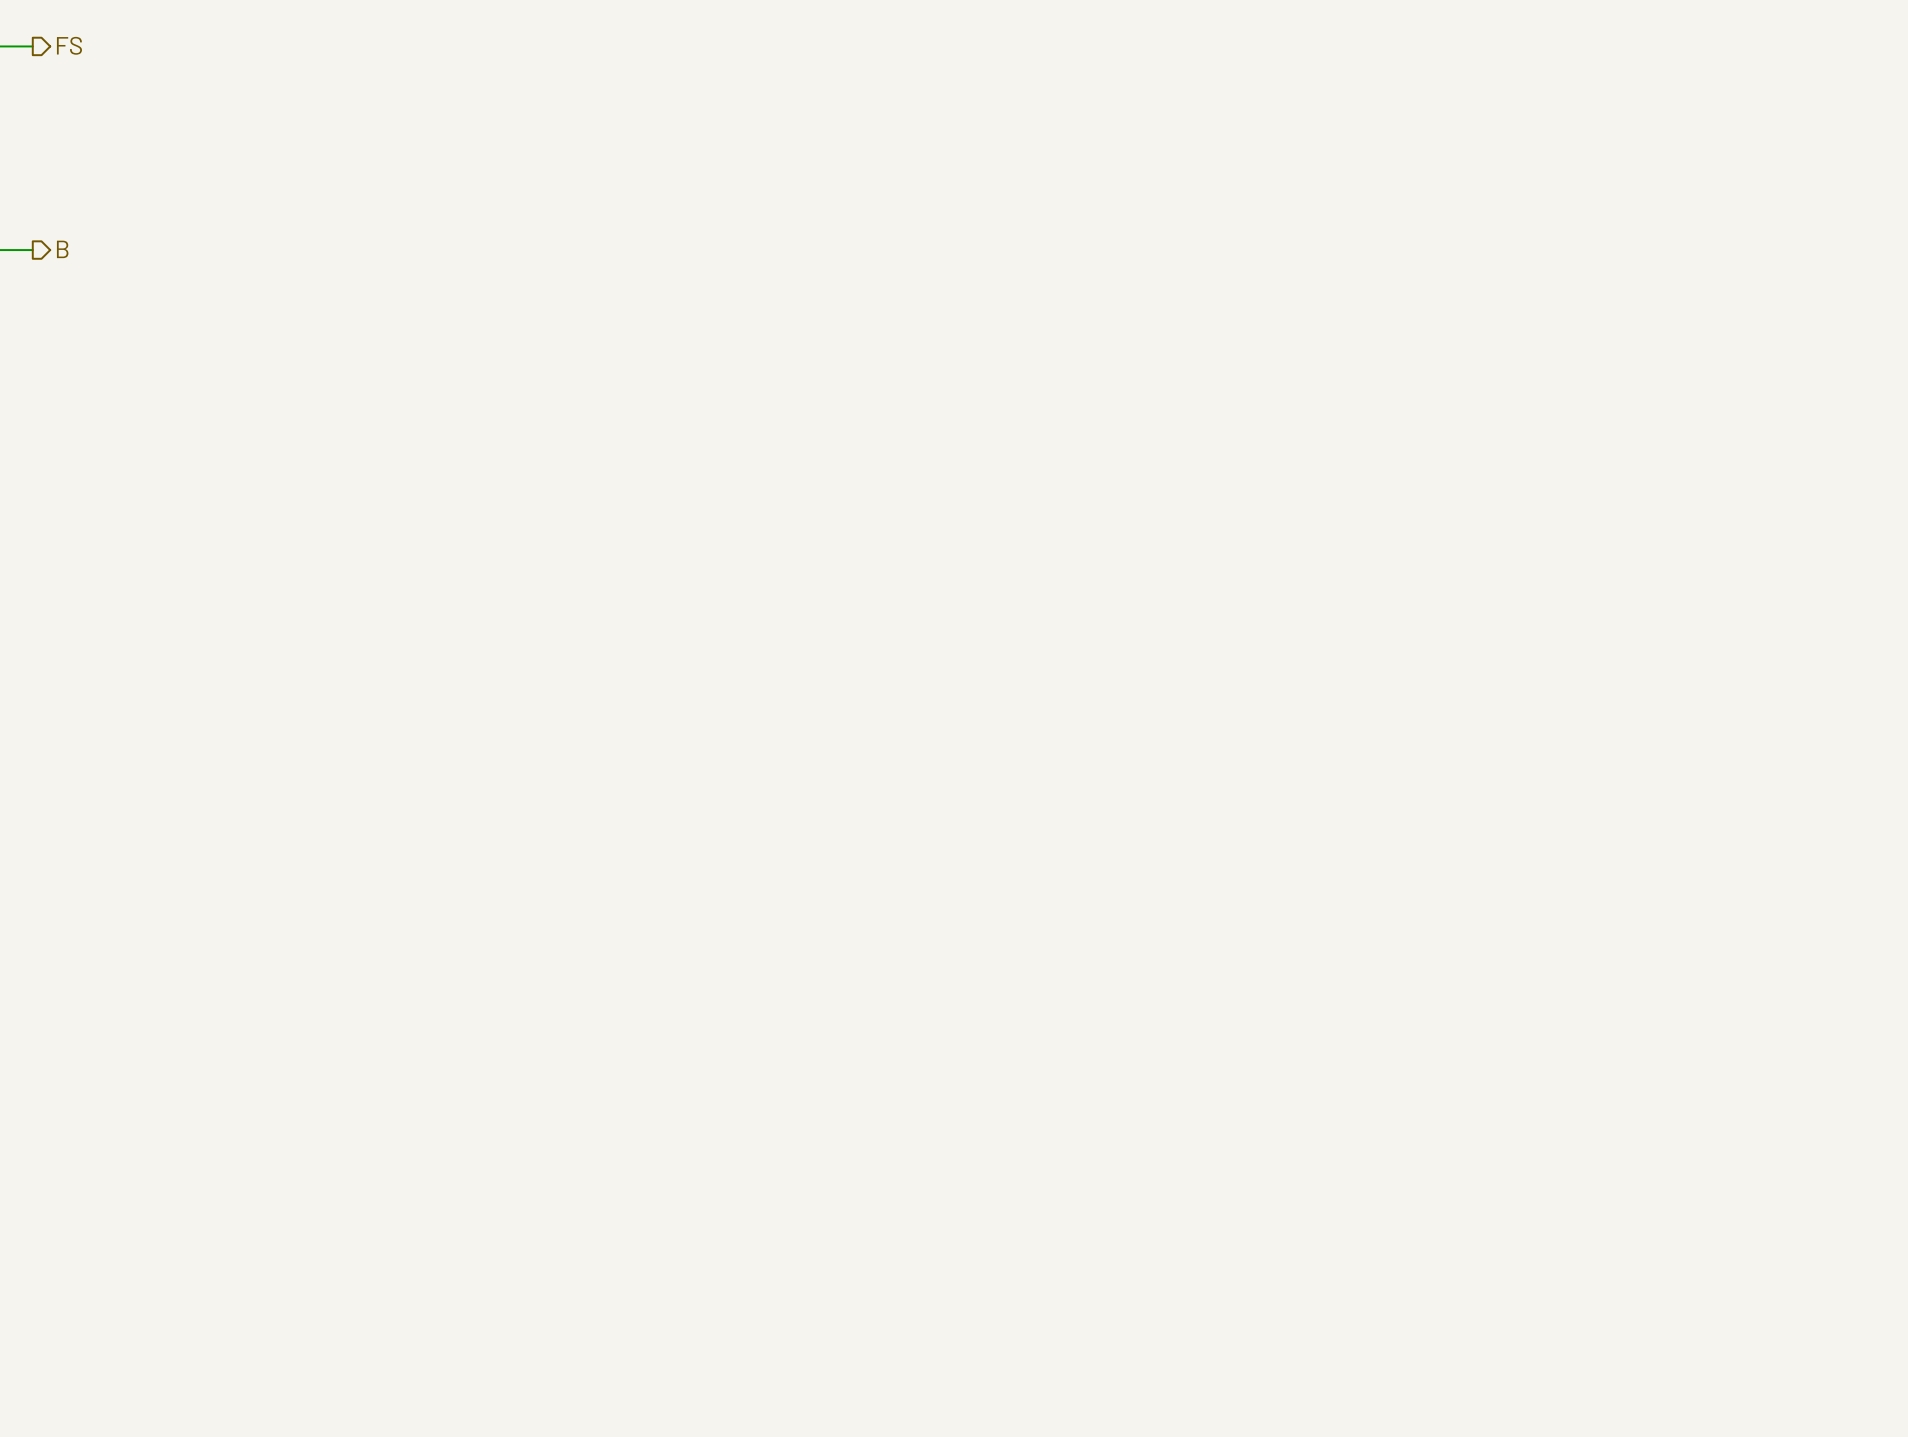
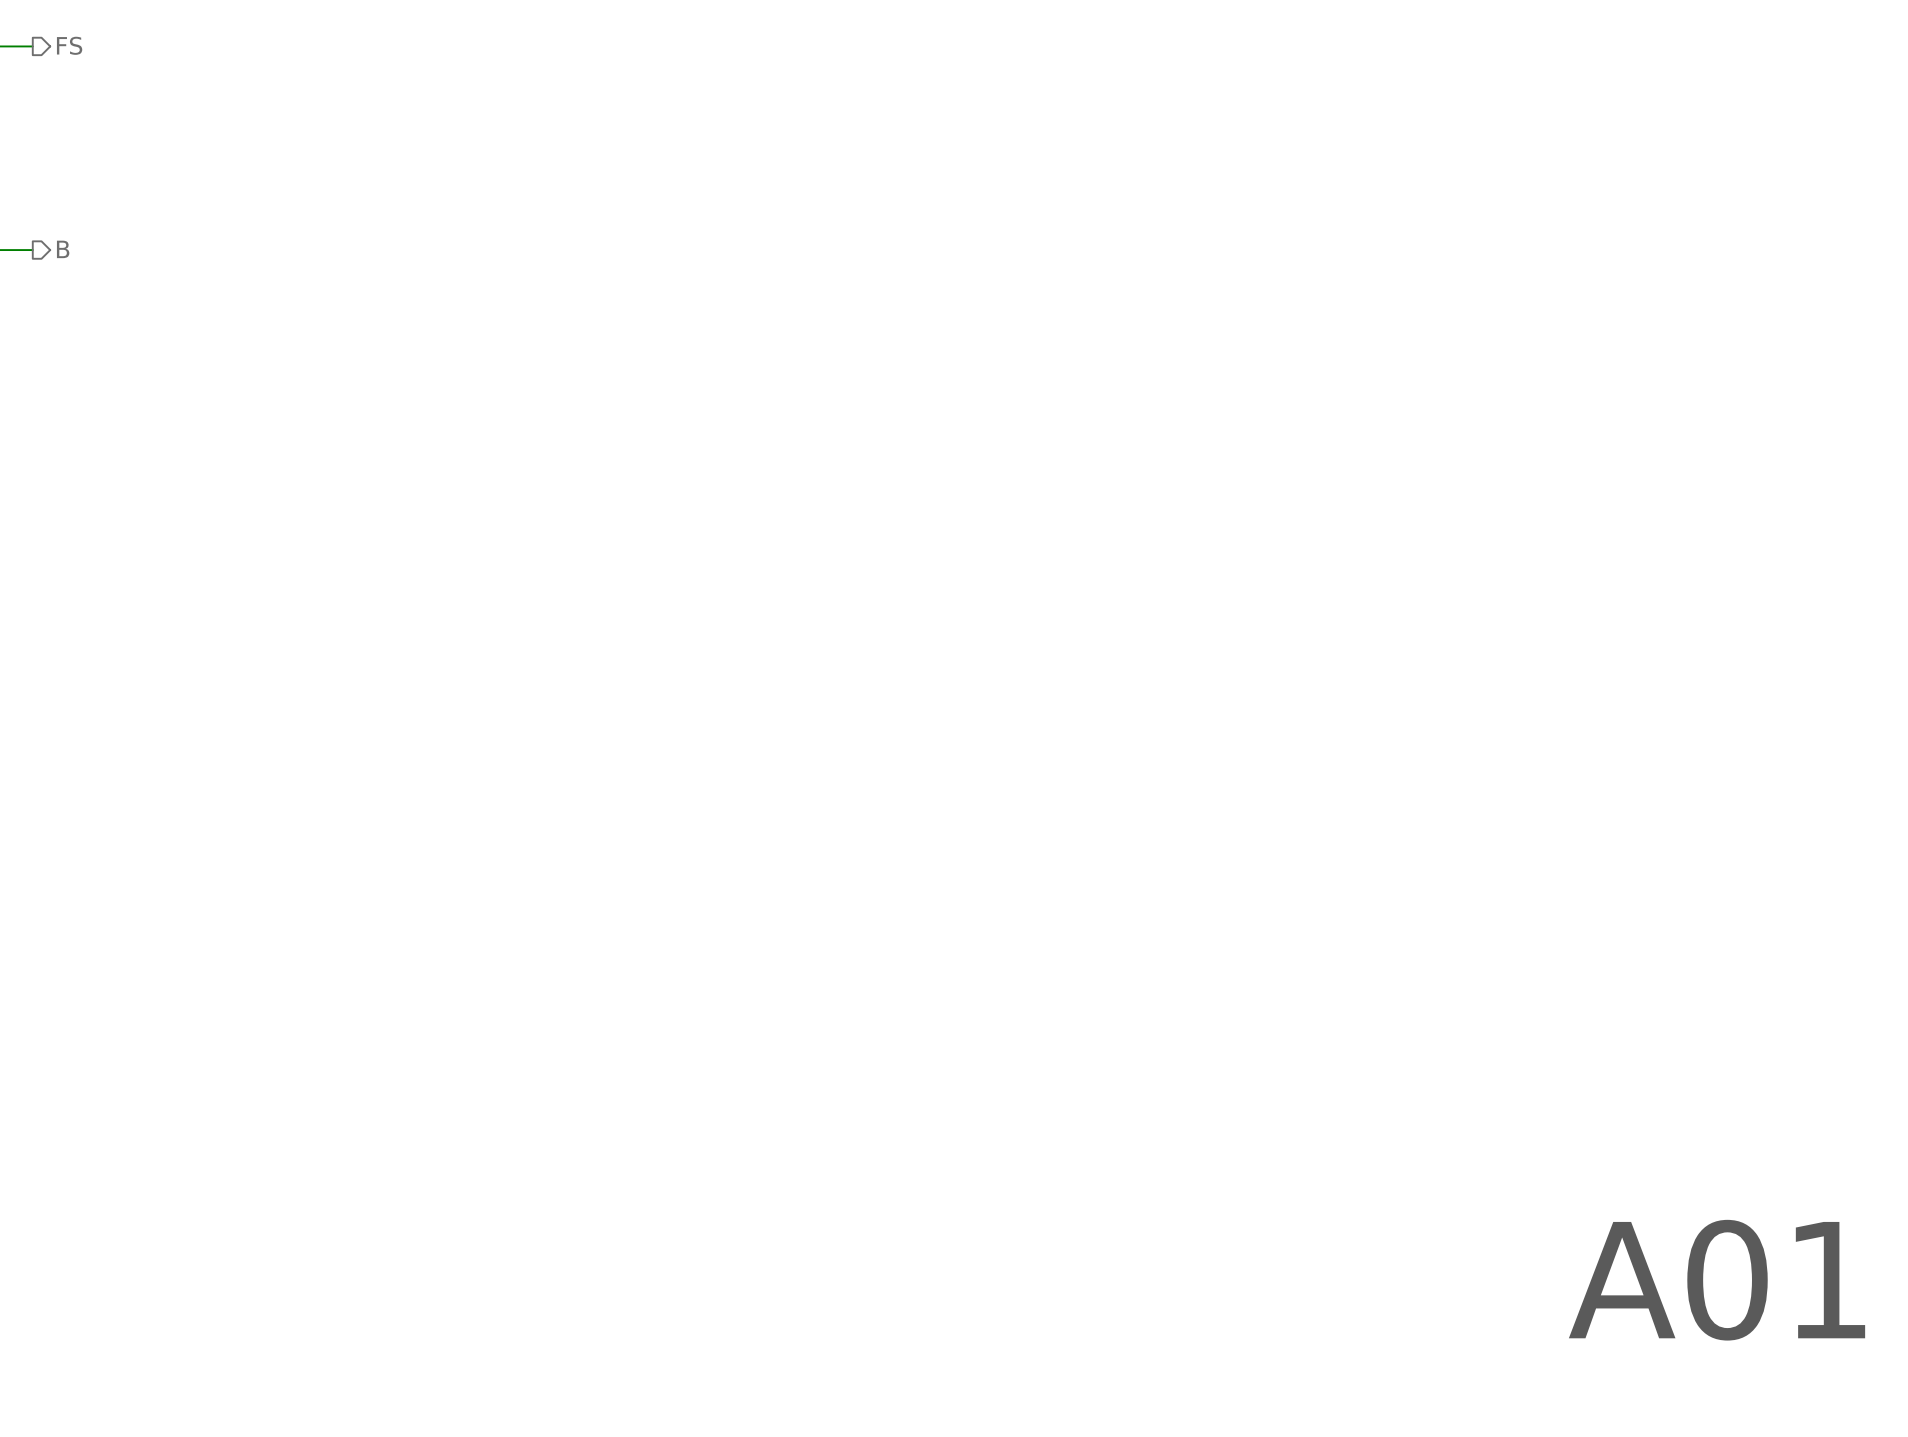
text: none -> A01 (1716, 1280)

